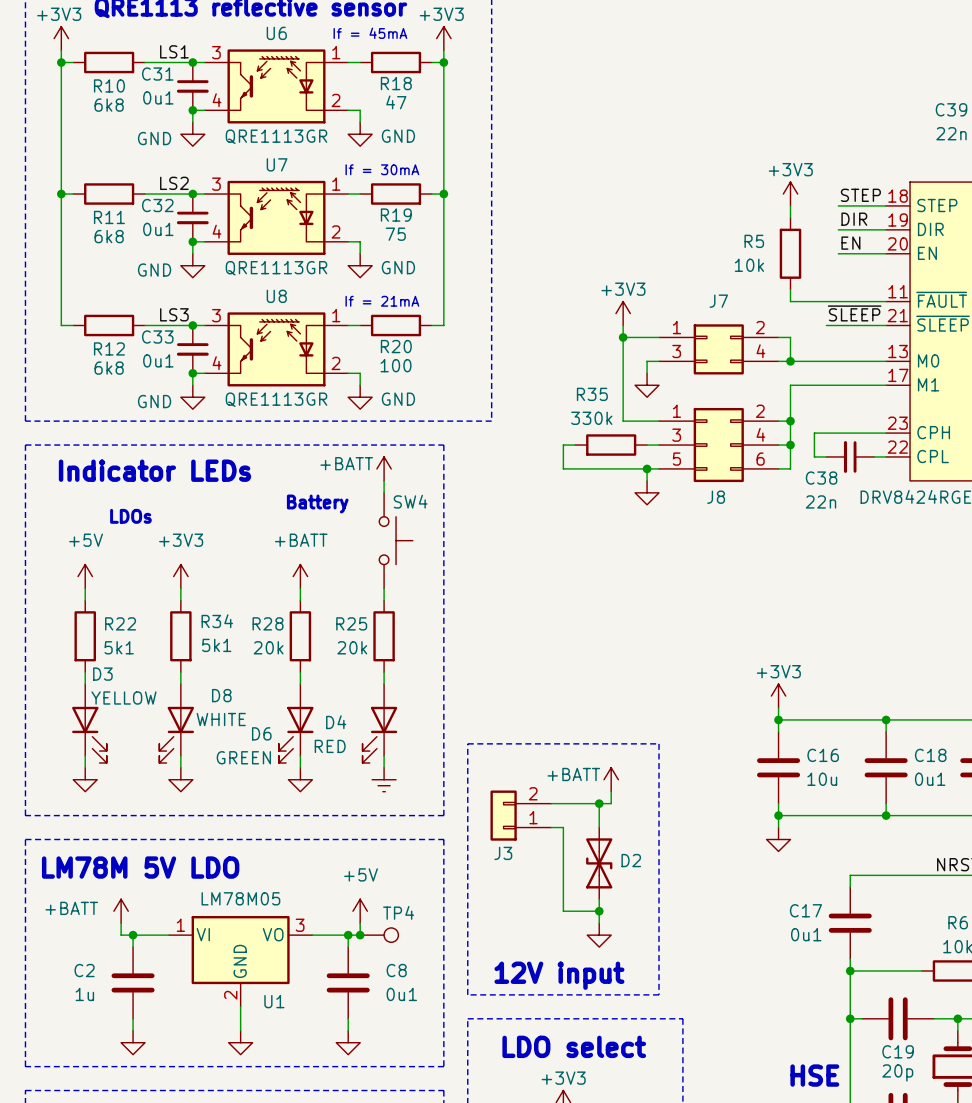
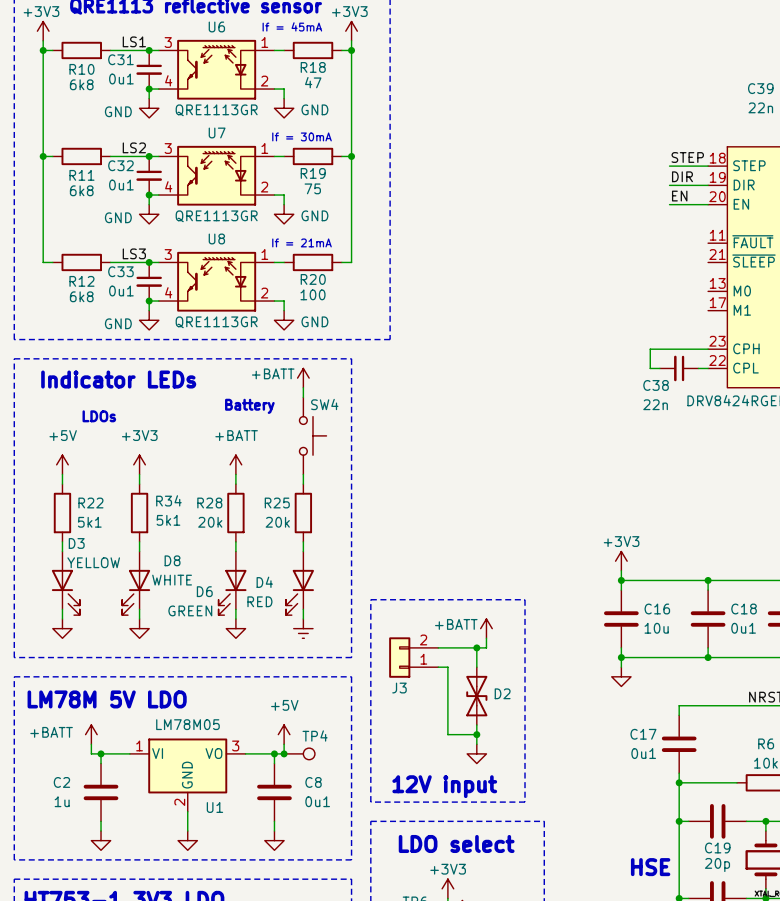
power symbol: +3V3 (790, 194) -> none
wire: (790, 205) (790, 217) -> none
R5: 10k (790, 253) -> none
wire: (790, 289) (790, 301) (886, 301) -> none
power symbol: +3V3 (623, 313) -> none
label: ~{SLEEP} (854, 313) -> none
wire: (623, 325) (623, 421) (659, 421) -> none
wire: (826, 325) (886, 325) -> none
wire: (623, 337) (659, 337) -> none
junction: (623, 337) -> none
wire: (778, 337) (790, 337) (790, 361) -> none
J7: (718, 349) -> none
wire: (659, 361) (647, 361) (647, 373) -> none
wire: (778, 361) (886, 361) -> none
junction: (790, 361) -> none
power symbol: (647, 385) -> none
wire: (886, 385) (790, 385) (790, 468) (778, 468) -> none
wire: (778, 421) (790, 421) -> none
junction: (790, 421) -> none
wire: (575, 445) (563, 445) (563, 468) (659, 468) -> none
R35: 330k (611, 445) -> none
wire: (647, 445) (659, 445) -> none
J8: (718, 445) -> none
wire: (778, 445) (790, 445) -> none
junction: (790, 445) -> none
wire: (647, 468) (647, 480) -> none
junction: (647, 468) -> none
power symbol: (647, 492) -> none

